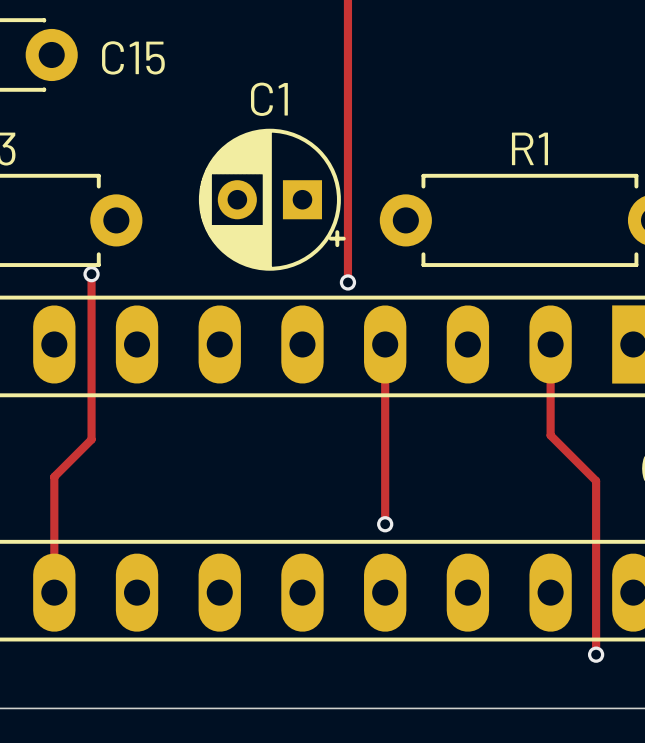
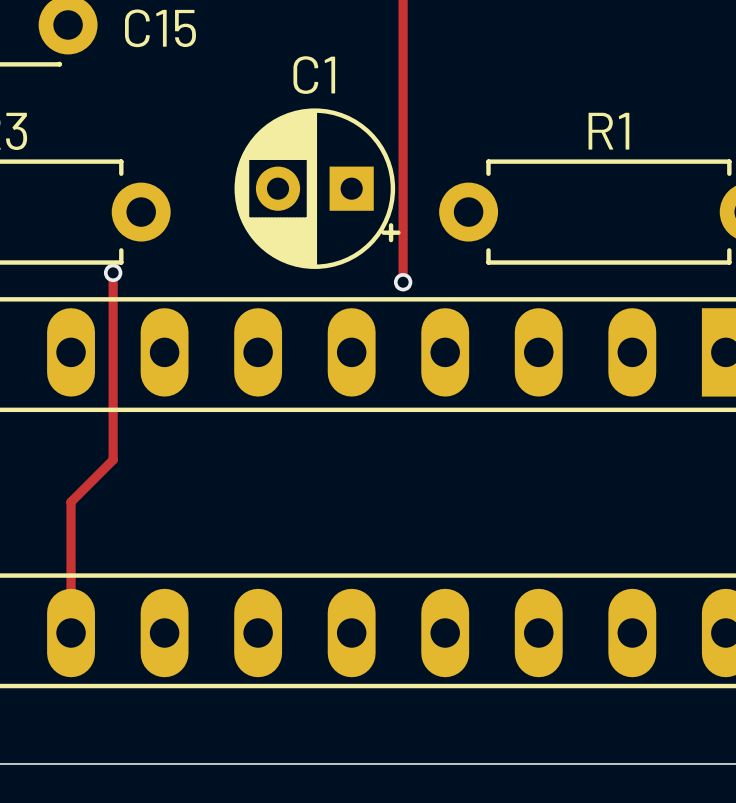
track: (385, 344) (385, 524) -> none
track: (550, 344) (550, 435) (596, 480) (596, 654) -> none
via: (385, 524) -> none
via: (596, 654) -> none

